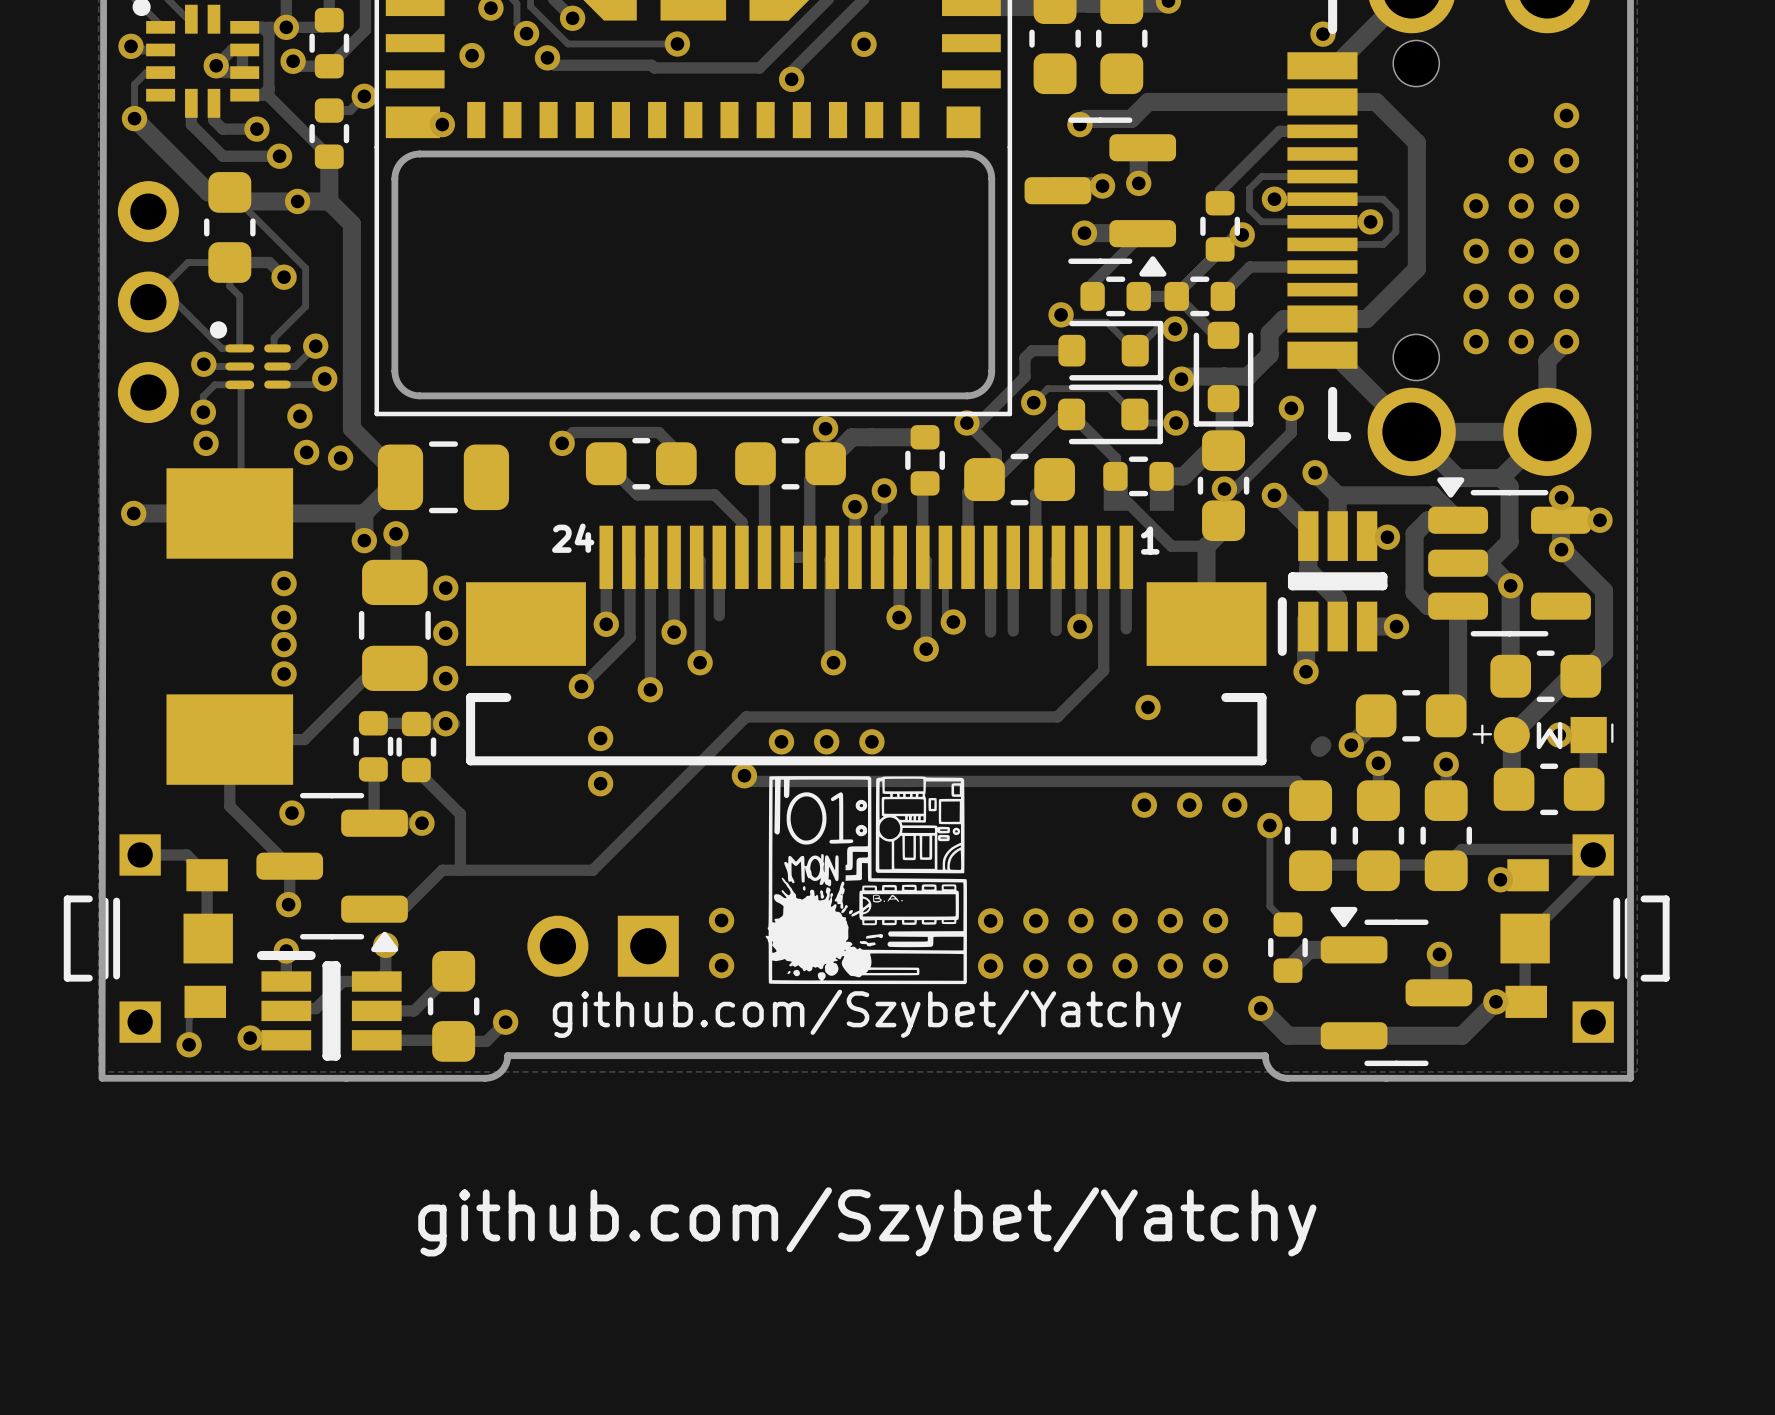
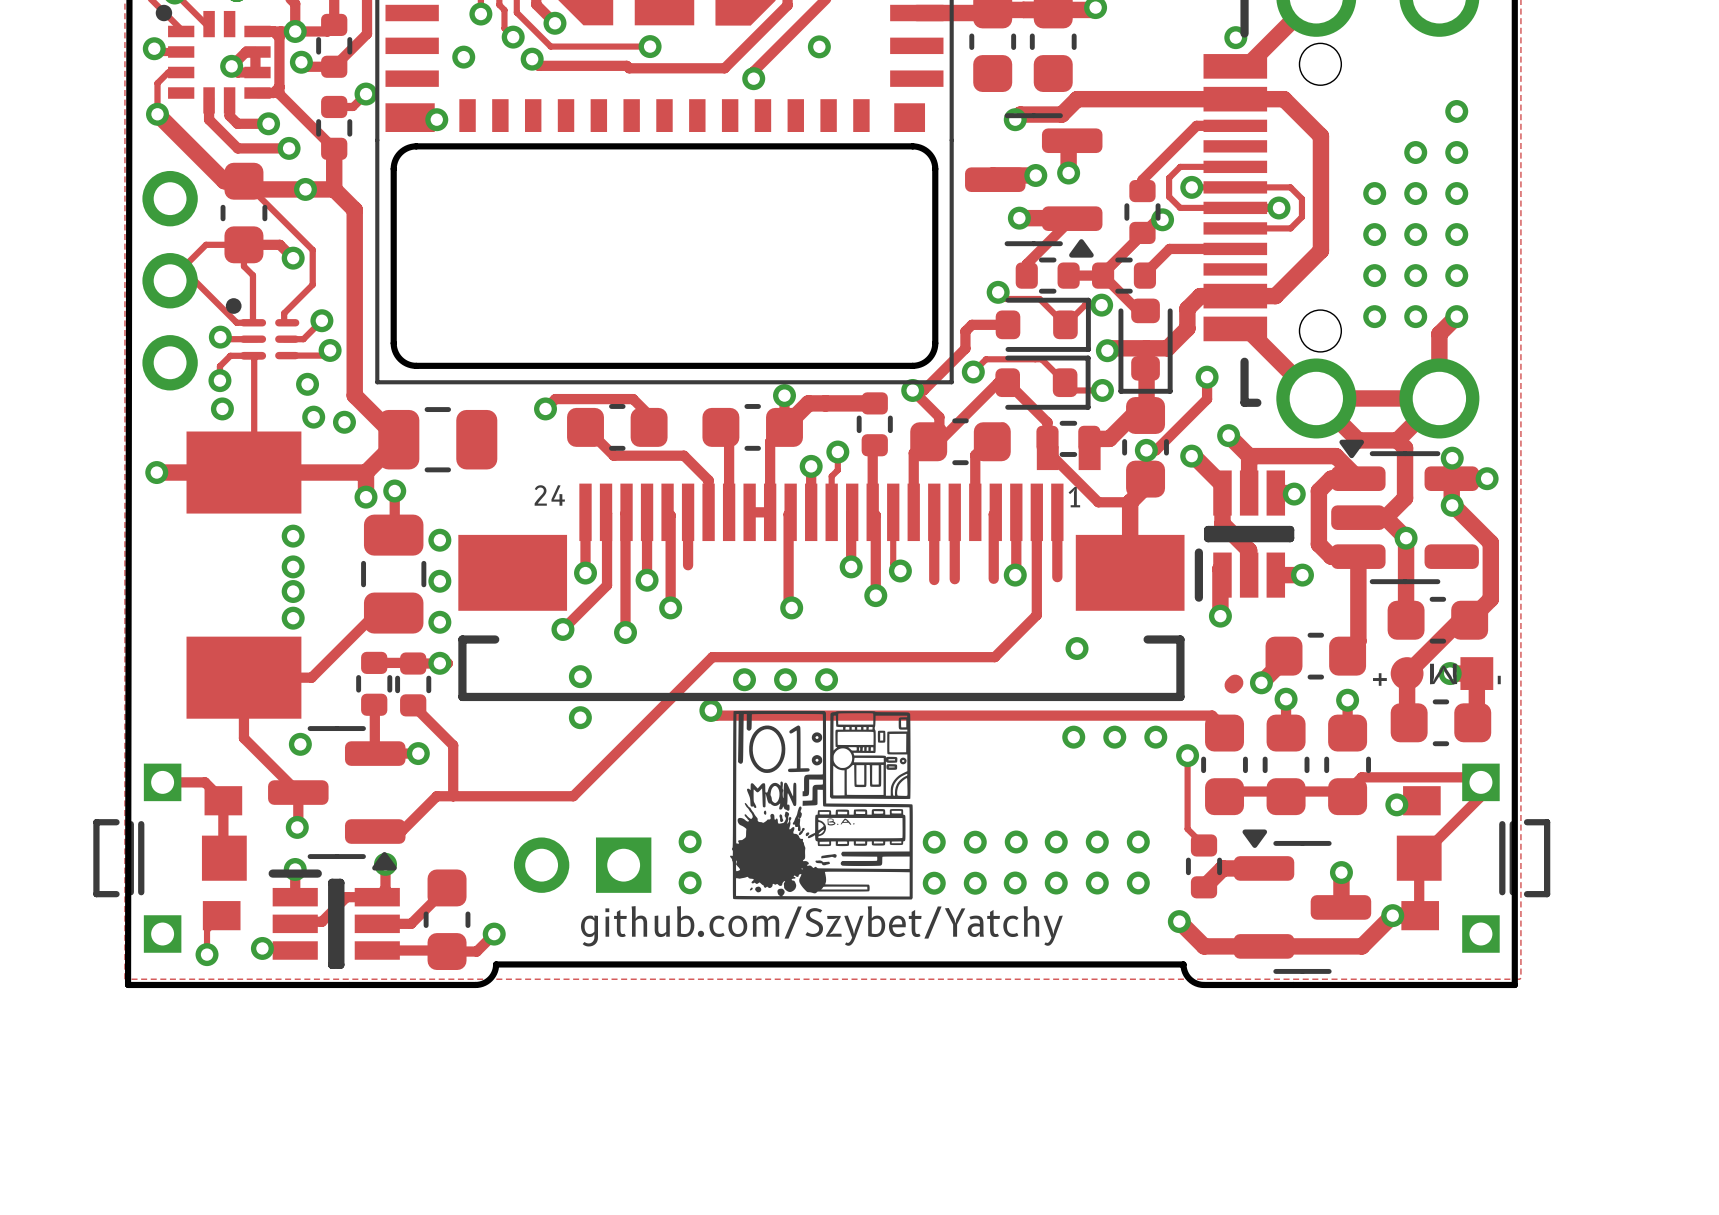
text: github.com/Szybet/Yatchy (867, 1221) -> none

